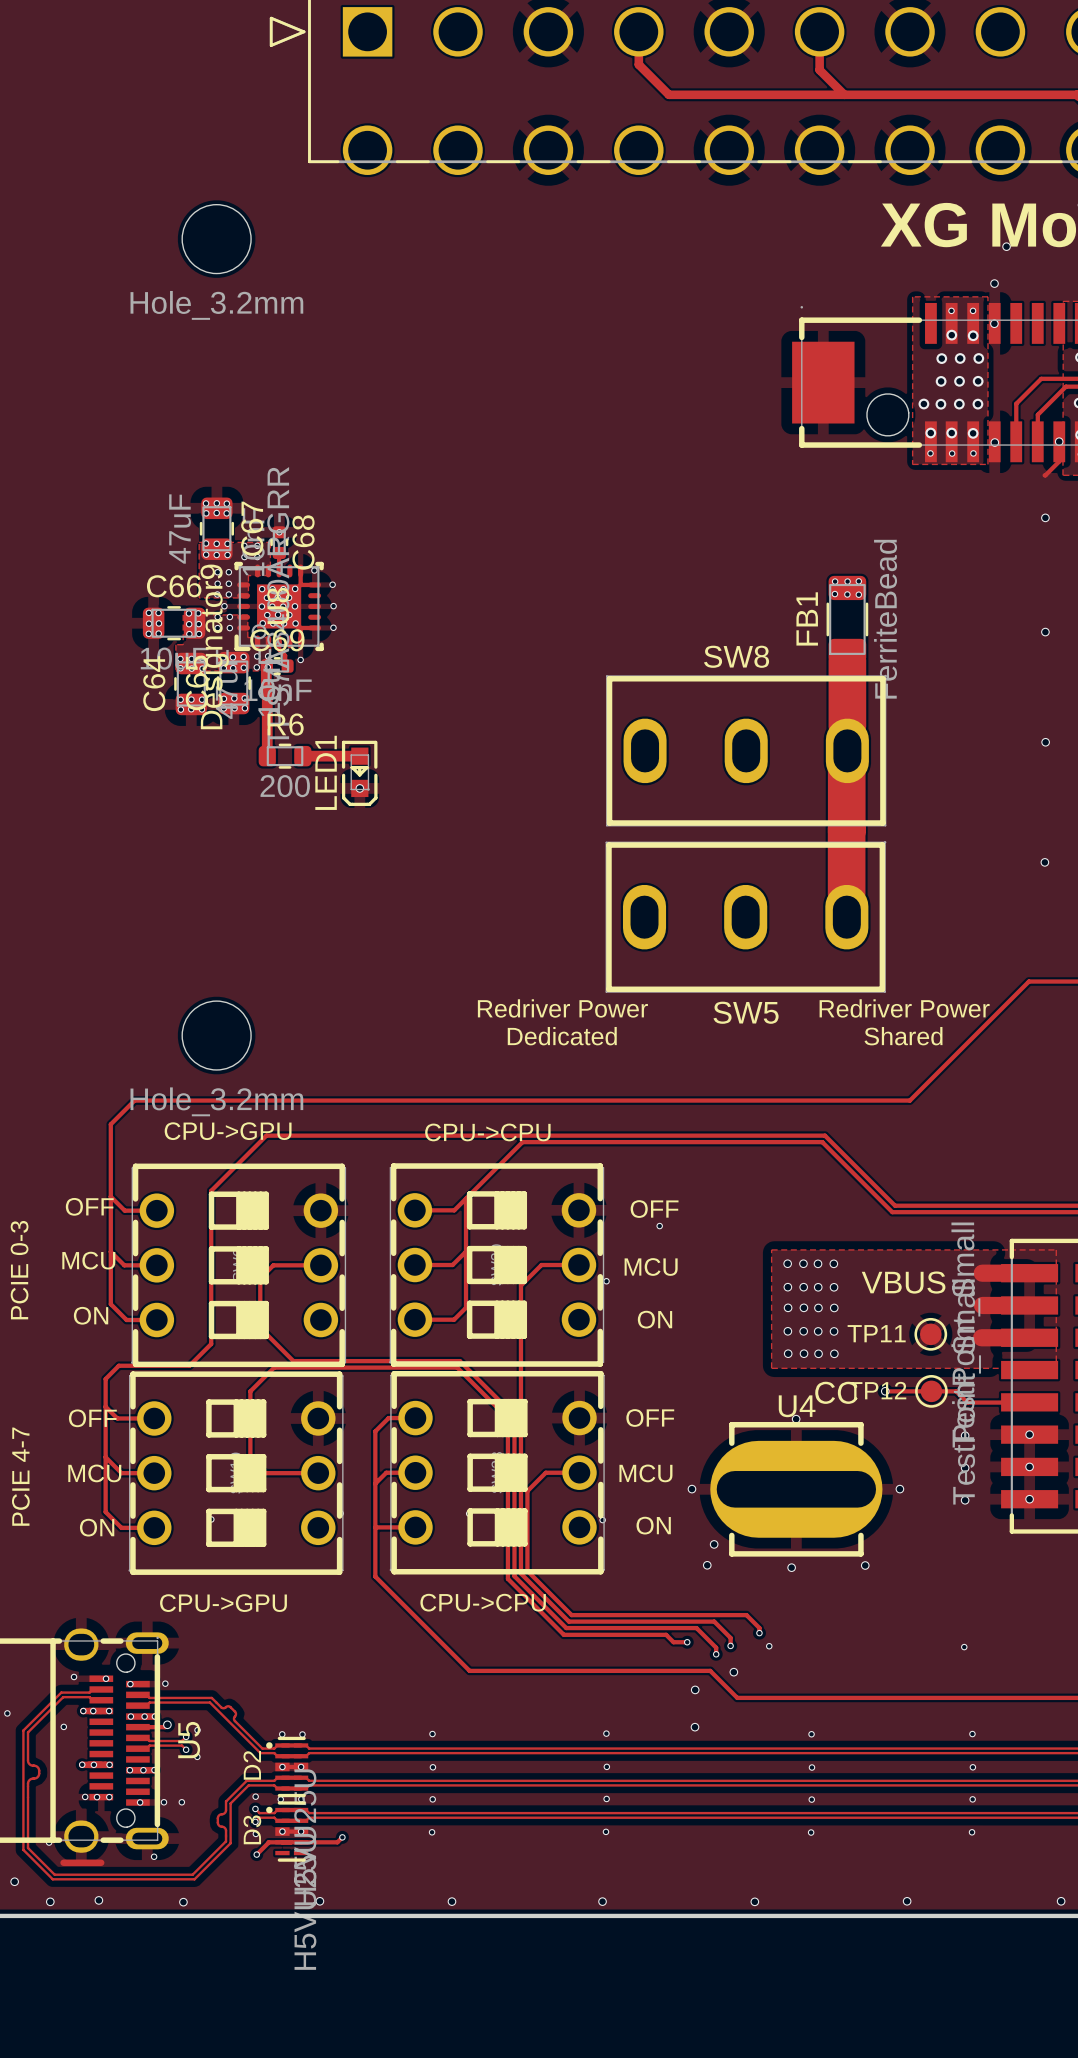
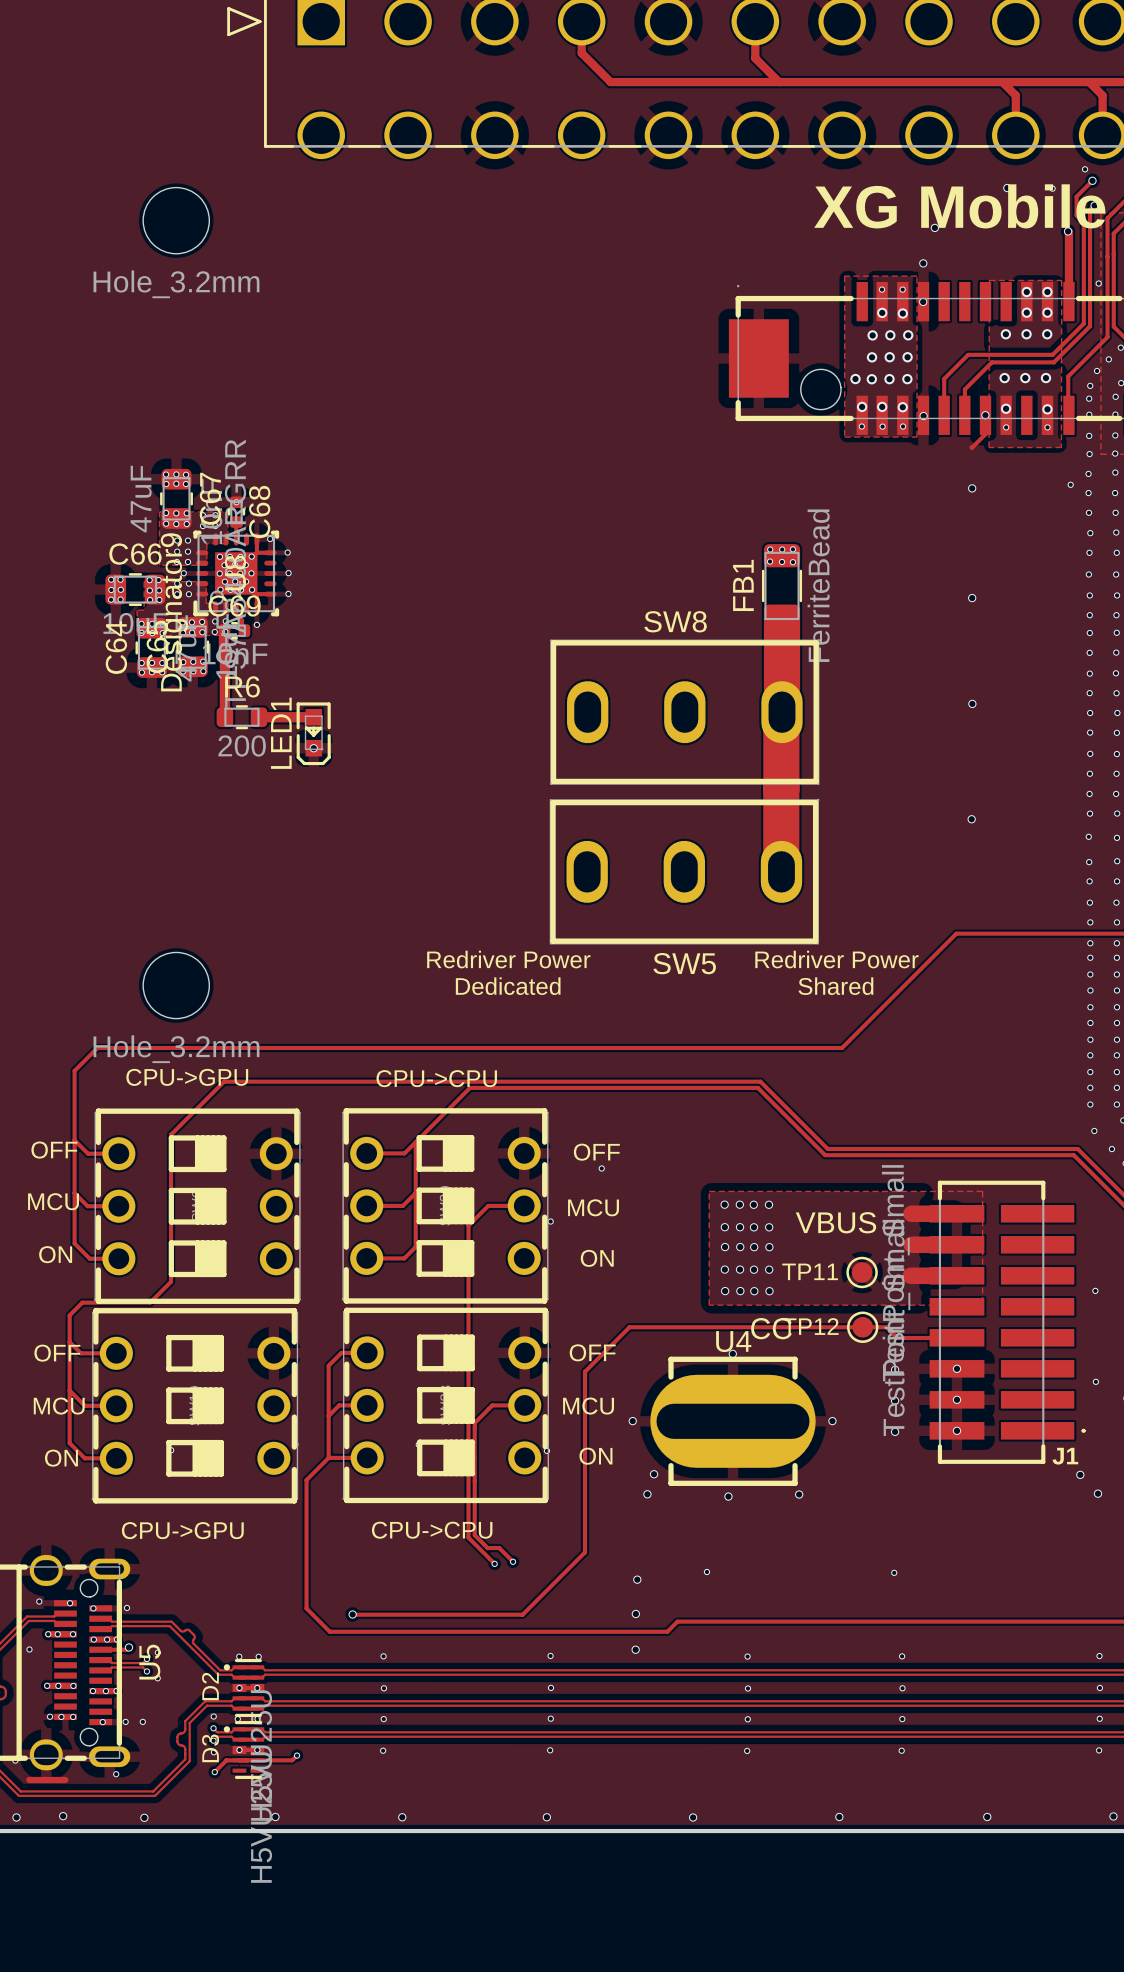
track: (320, 1265) (273, 1265) (260, 1278) (260, 1327) (293, 1361) (459, 1361) (514, 1415) (514, 1576) (566, 1628) (696, 1628) (716, 1647) (716, 1654) -> none
track: none -> (818, 1327) (629, 1327) (585, 1371) (585, 1552) (522, 1614) (353, 1614)
via: (885, 1391) -> none
track: (318, 1473) (265, 1473) (250, 1457) (250, 1391) (274, 1367) (457, 1367) (507, 1418) (507, 1578) (563, 1634) (666, 1634) (673, 1642) (687, 1642) -> none
track: (375, 1527) (375, 1576) (469, 1670) (710, 1670) (738, 1697) -> (328, 1457) (306, 1480) (306, 1608) (329, 1631) (667, 1631) (677, 1621)
track: (527, 1570) (571, 1615) (746, 1615) (759, 1628) (759, 1633) -> (474, 1499) (474, 1535) (487, 1548) (499, 1548) (513, 1561)
track: (520, 1573) (568, 1621) (714, 1621) (730, 1637) (730, 1645) -> (468, 1502) (468, 1537) (494, 1563)
via: (759, 1633) -> none
via: none -> (513, 1561)
via: none -> (494, 1563)
via: (687, 1642) -> none
via: (730, 1645) -> none
via: (716, 1654) -> none
via position: (733, 1672) -> (637, 1579)
via: none -> (352, 1614)

